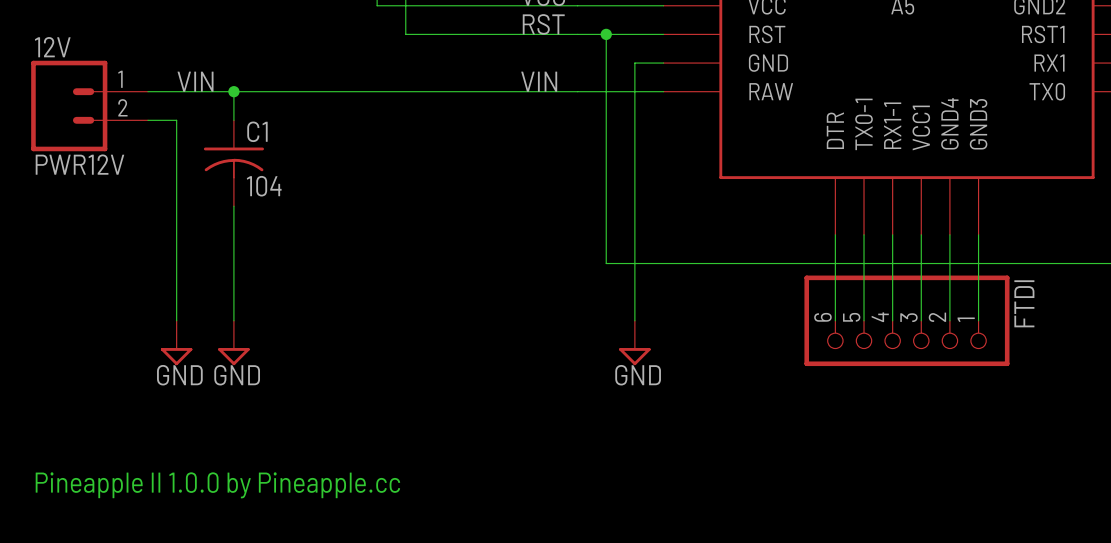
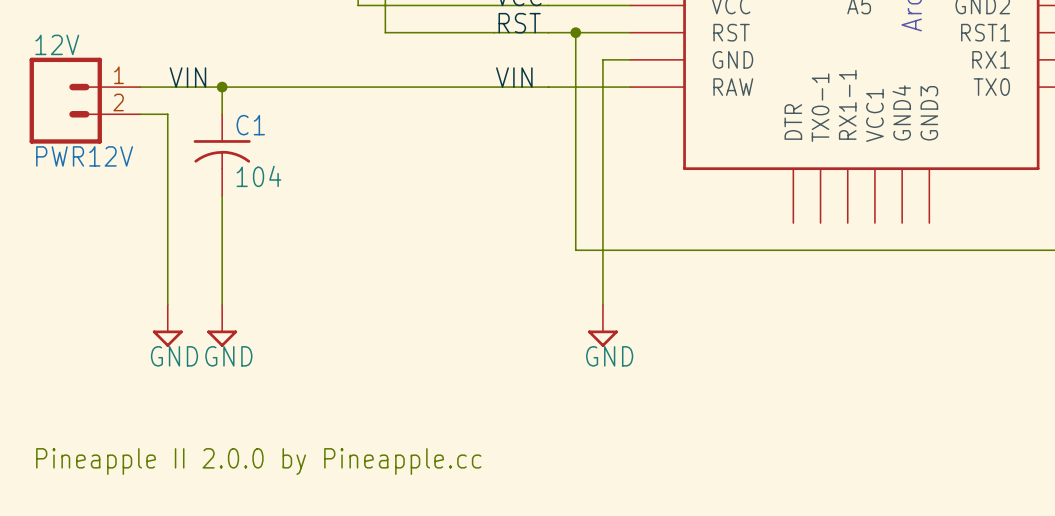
wire: (835, 234) (835, 320) -> none
wire: (864, 234) (864, 320) -> none
wire: (892, 234) (892, 320) -> none
wire: (921, 234) (921, 320) -> none
wire: (949, 234) (949, 320) -> none
wire: (978, 234) (978, 320) -> none
FTDI: (906, 320) -> none
text: Pineapple II 1.0.0 by Pineapple.cc (217, 485) -> Pineapple II 2.0.0 by Pineapple.cc (258, 461)

